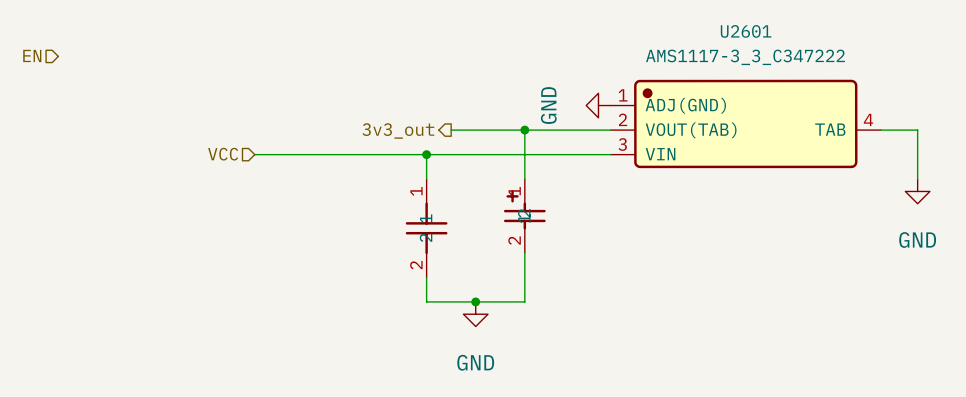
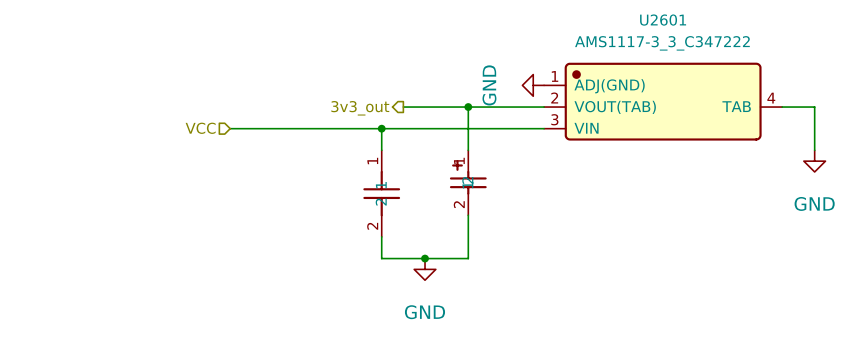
hierarchical label: EN (32, 55) -> none

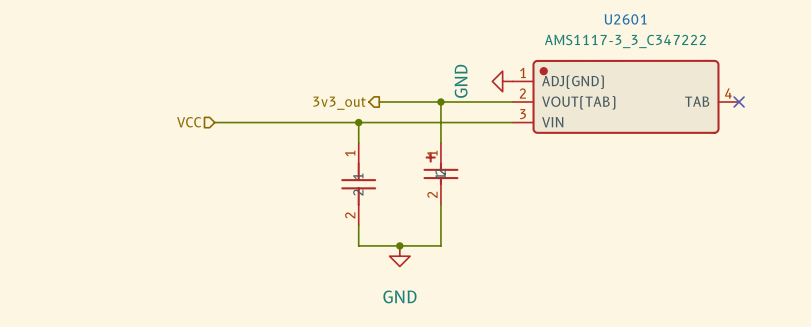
wire: (782, 107) (814, 107) (814, 150) -> none
no-connect mark: none -> (739, 101)
power symbol: GND (814, 161) -> none

